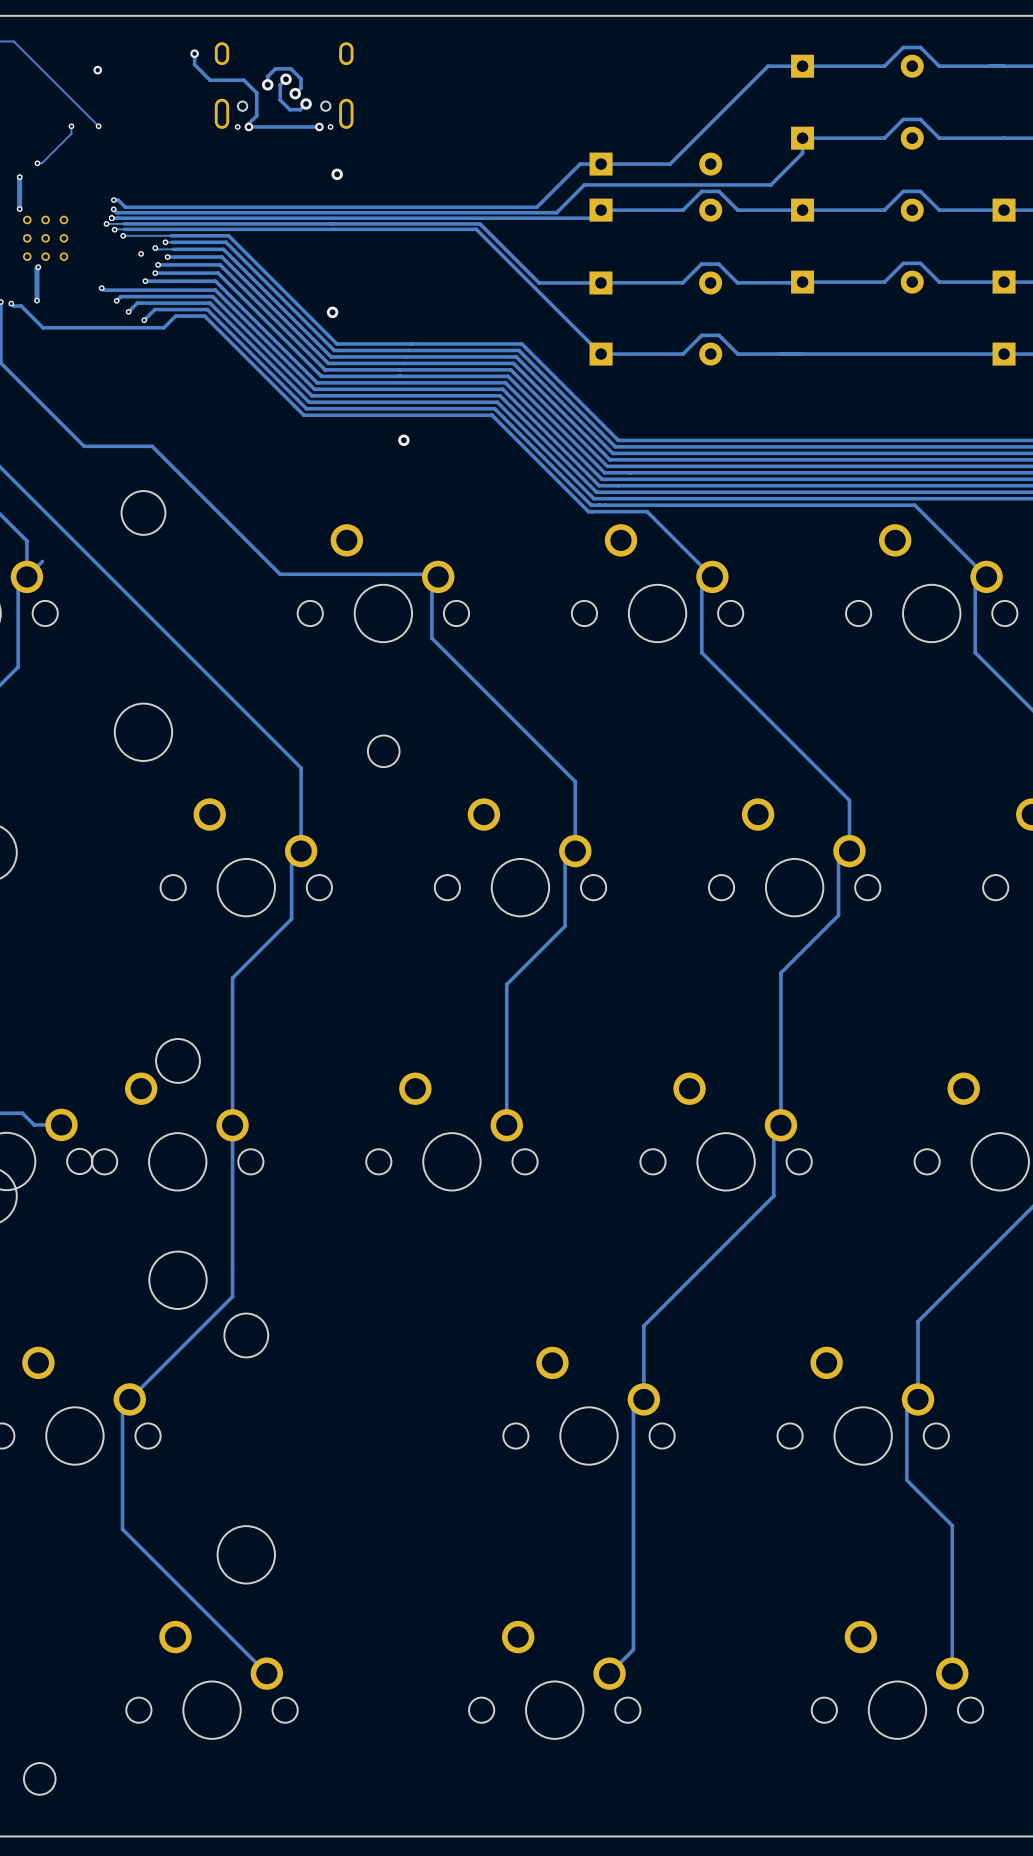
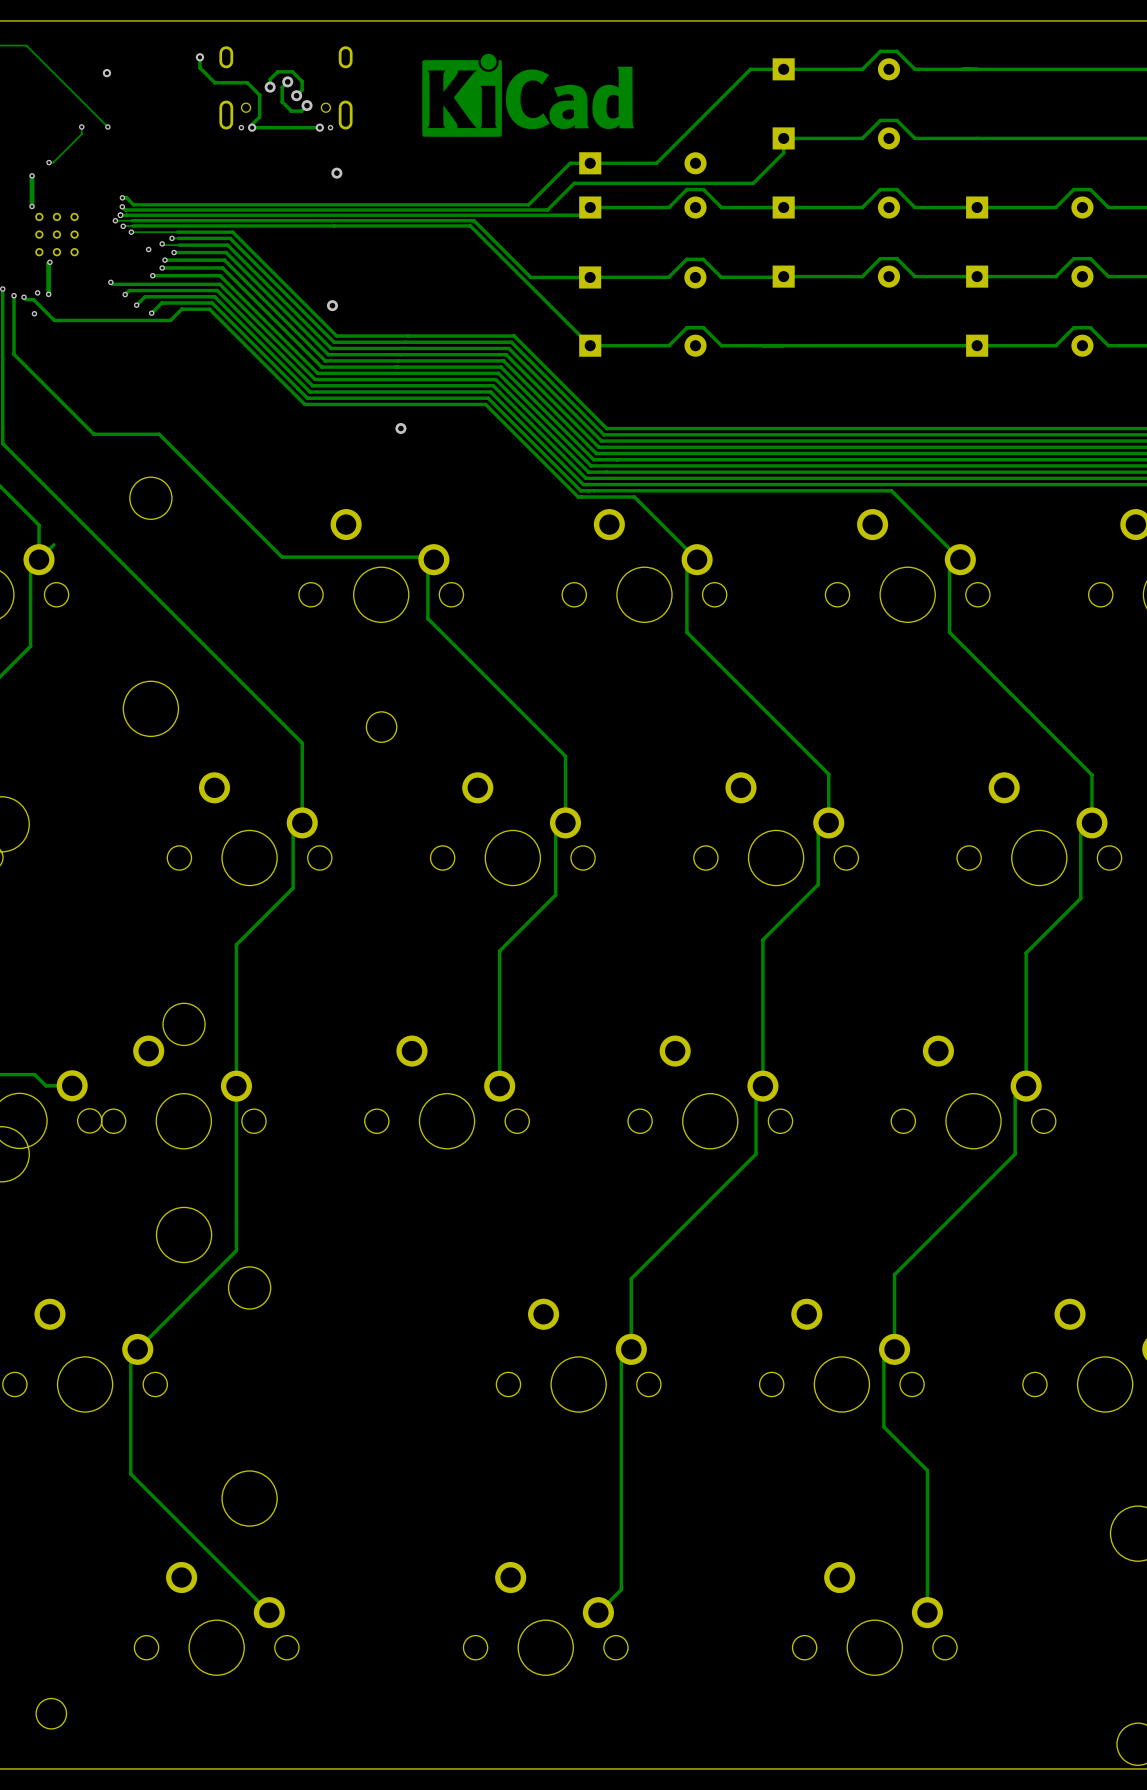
drawing: none -> [422, 53, 635, 137]
via: none -> (37, 292)
via: none -> (34, 313)

